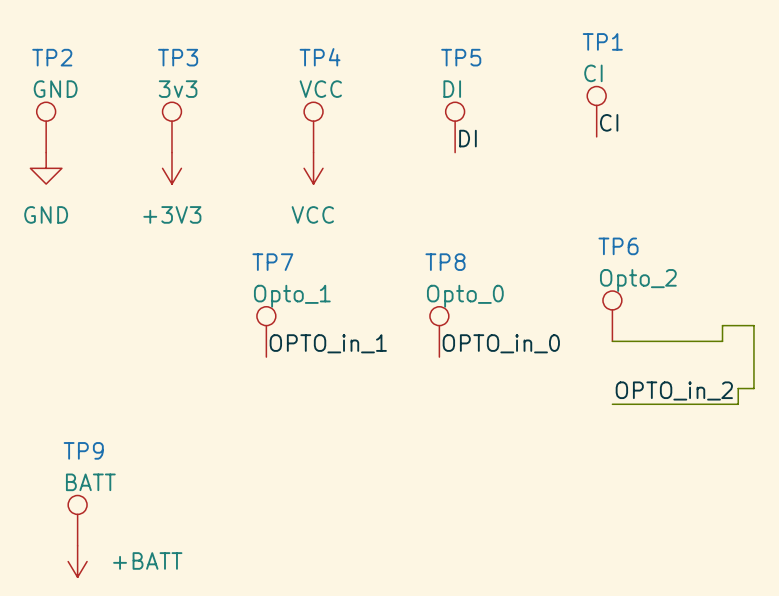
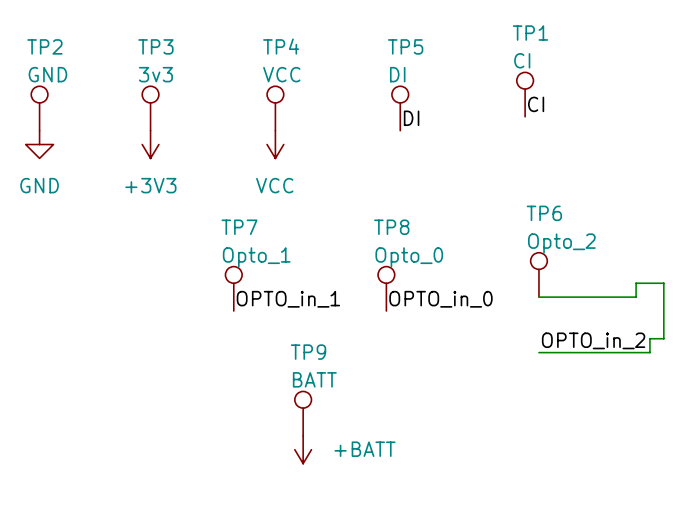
TP9 position: (77, 520) -> (303, 413)
power symbol position: +BATT (77, 561) -> +BATT (303, 449)

